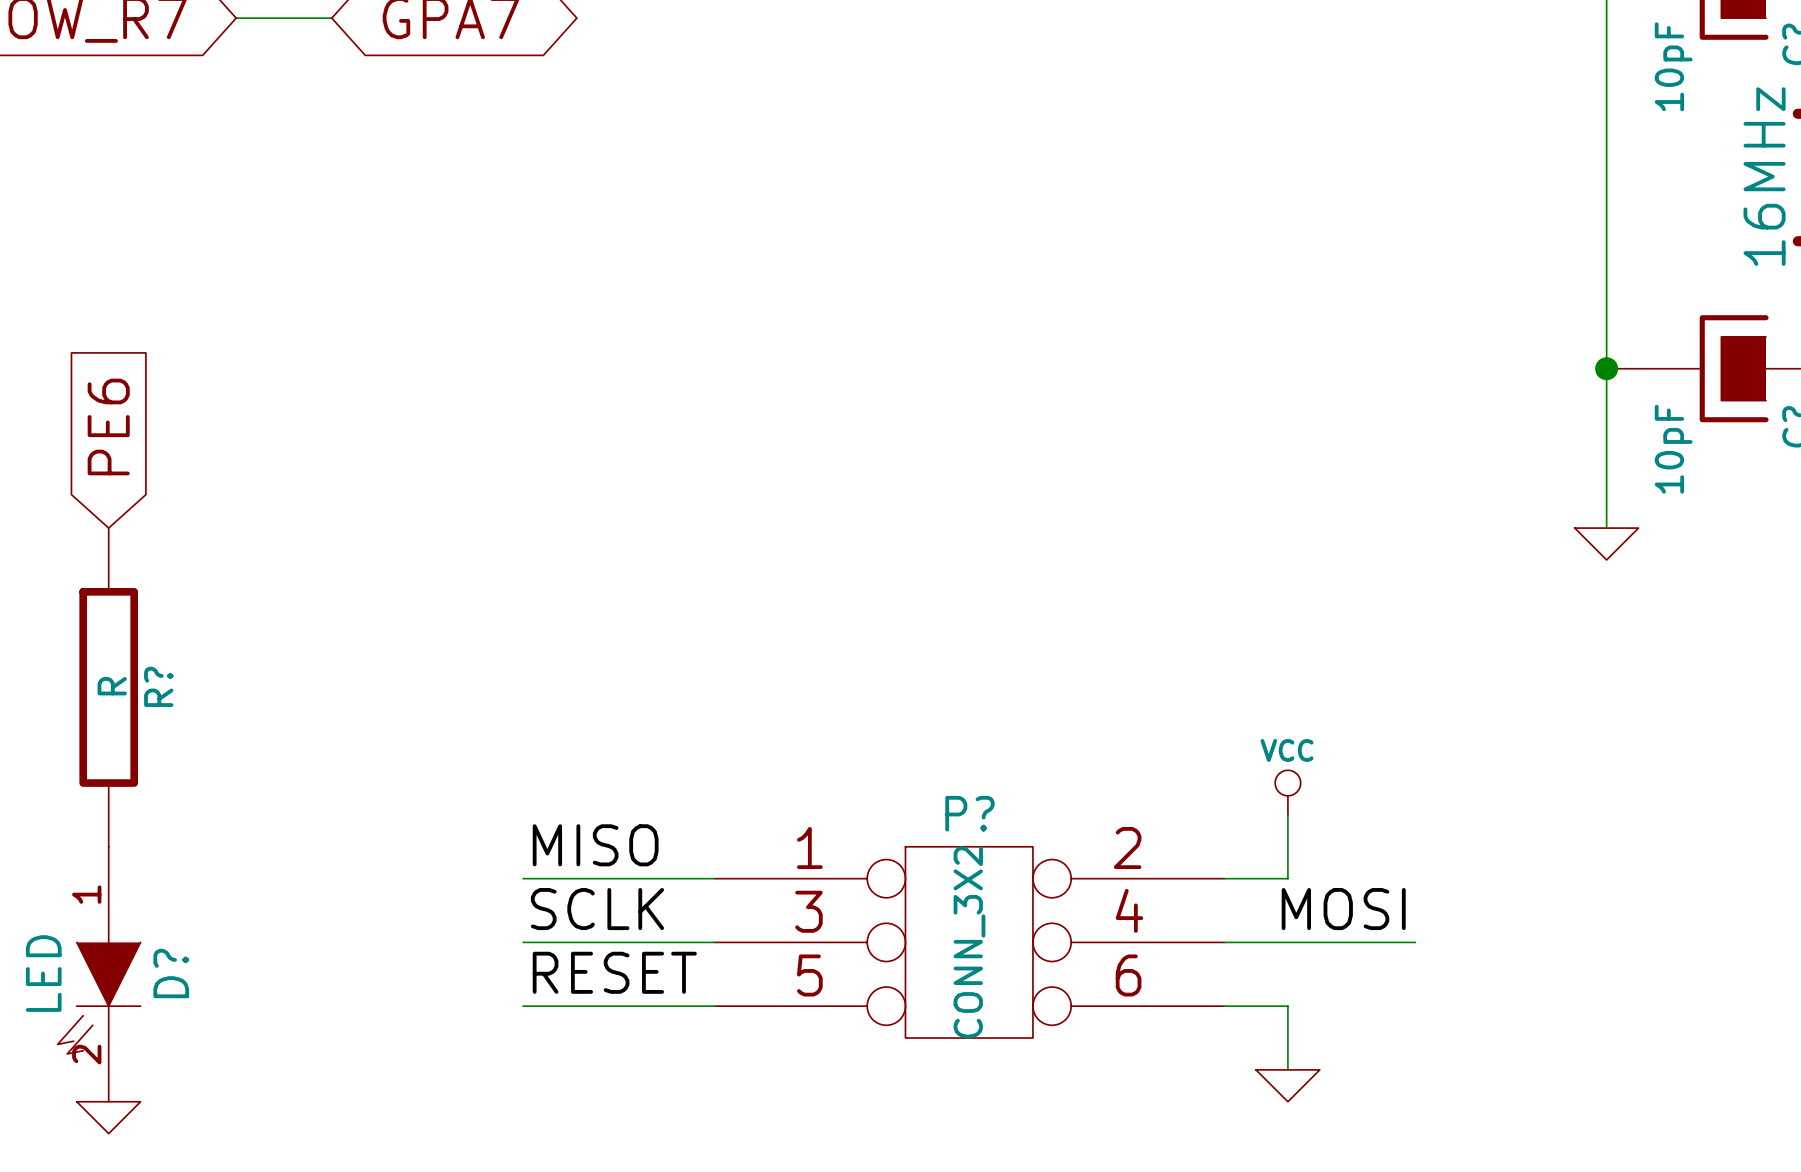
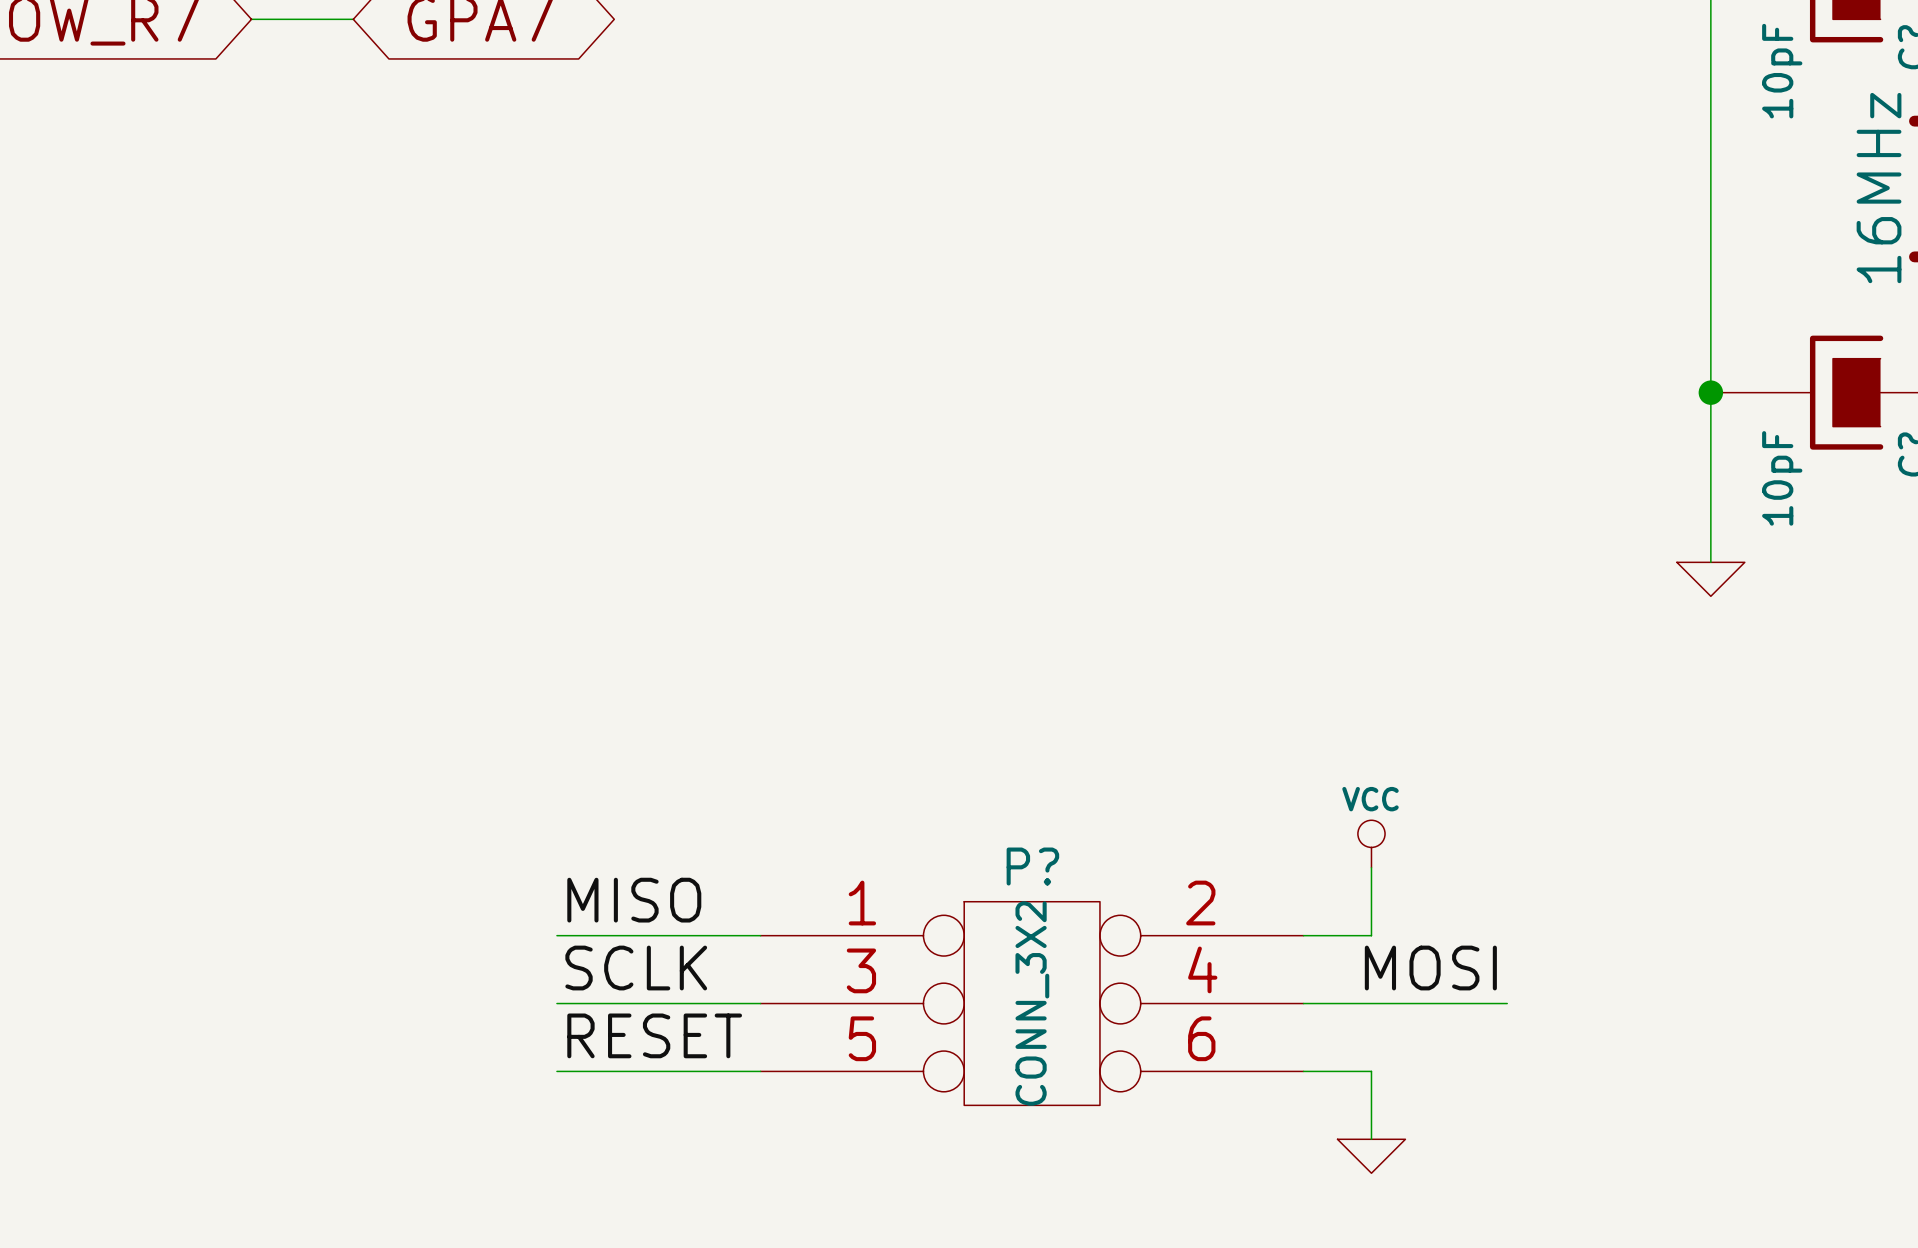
global label: PE6 (108, 427) -> none
R?: R (108, 687) -> none
D?: LED (99, 974) -> none
power symbol: (108, 1117) -> none

